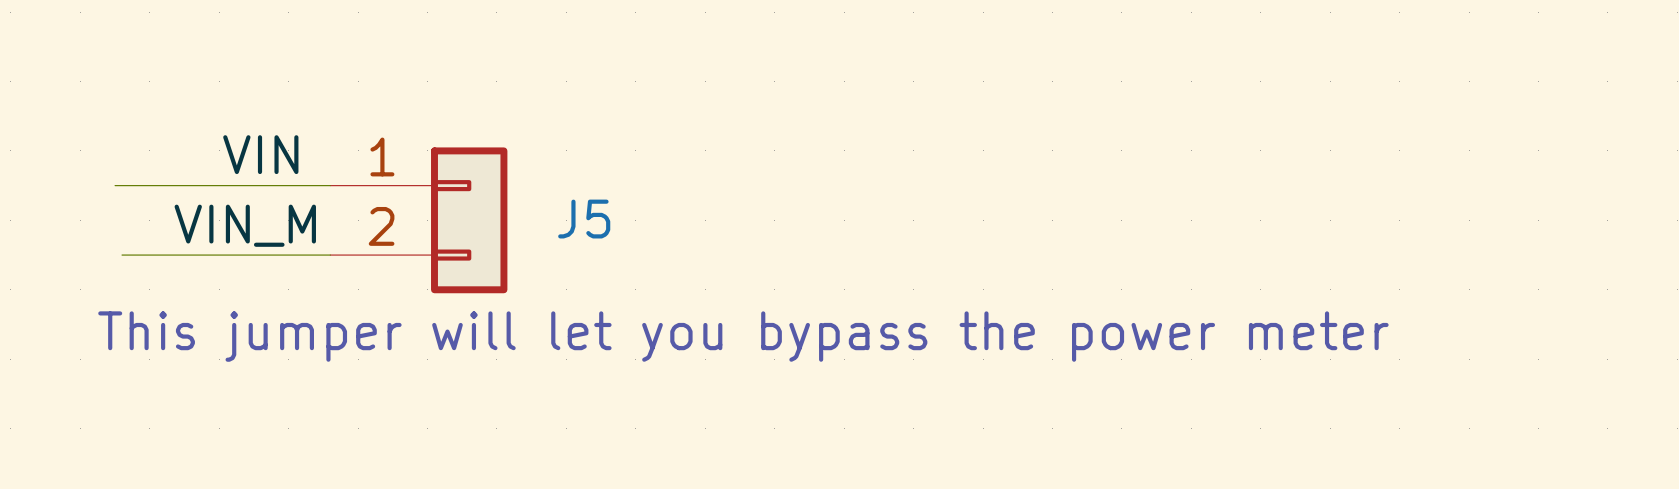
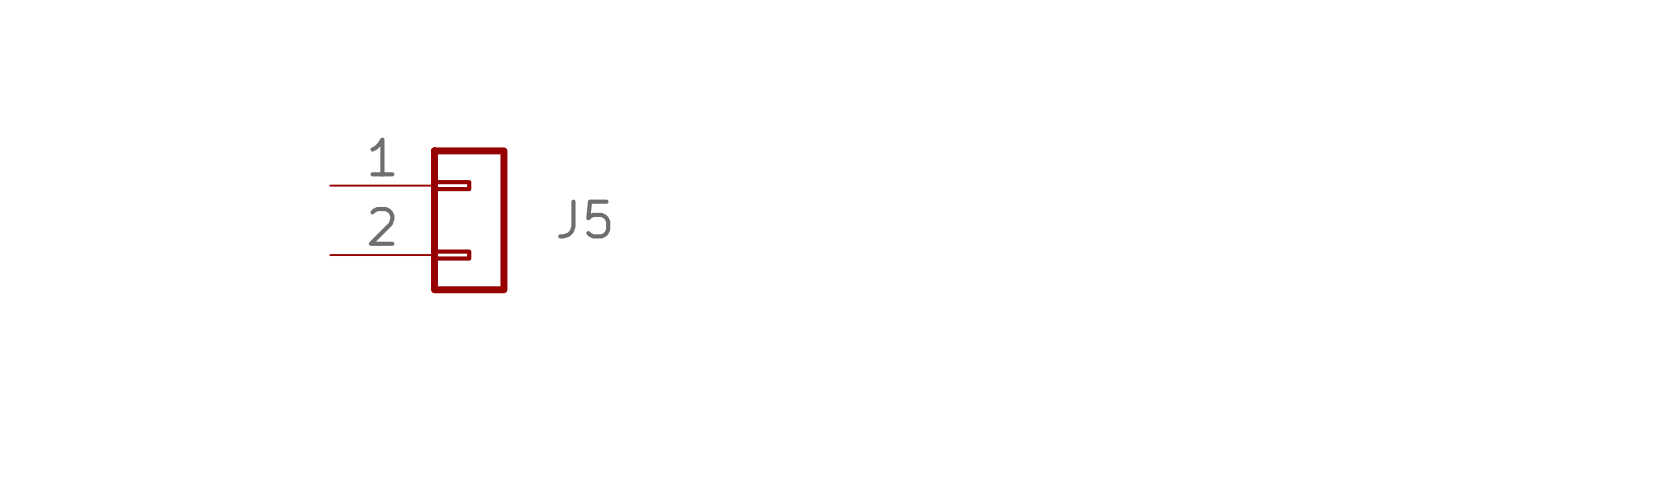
label: VIN (260, 154) -> none
wire: (115, 185) (330, 185) -> none
label: VIN_M (245, 225) -> none
wire: (122, 255) (330, 255) -> none
text: This jumper will let you bypass the power meter (743, 336) -> none

